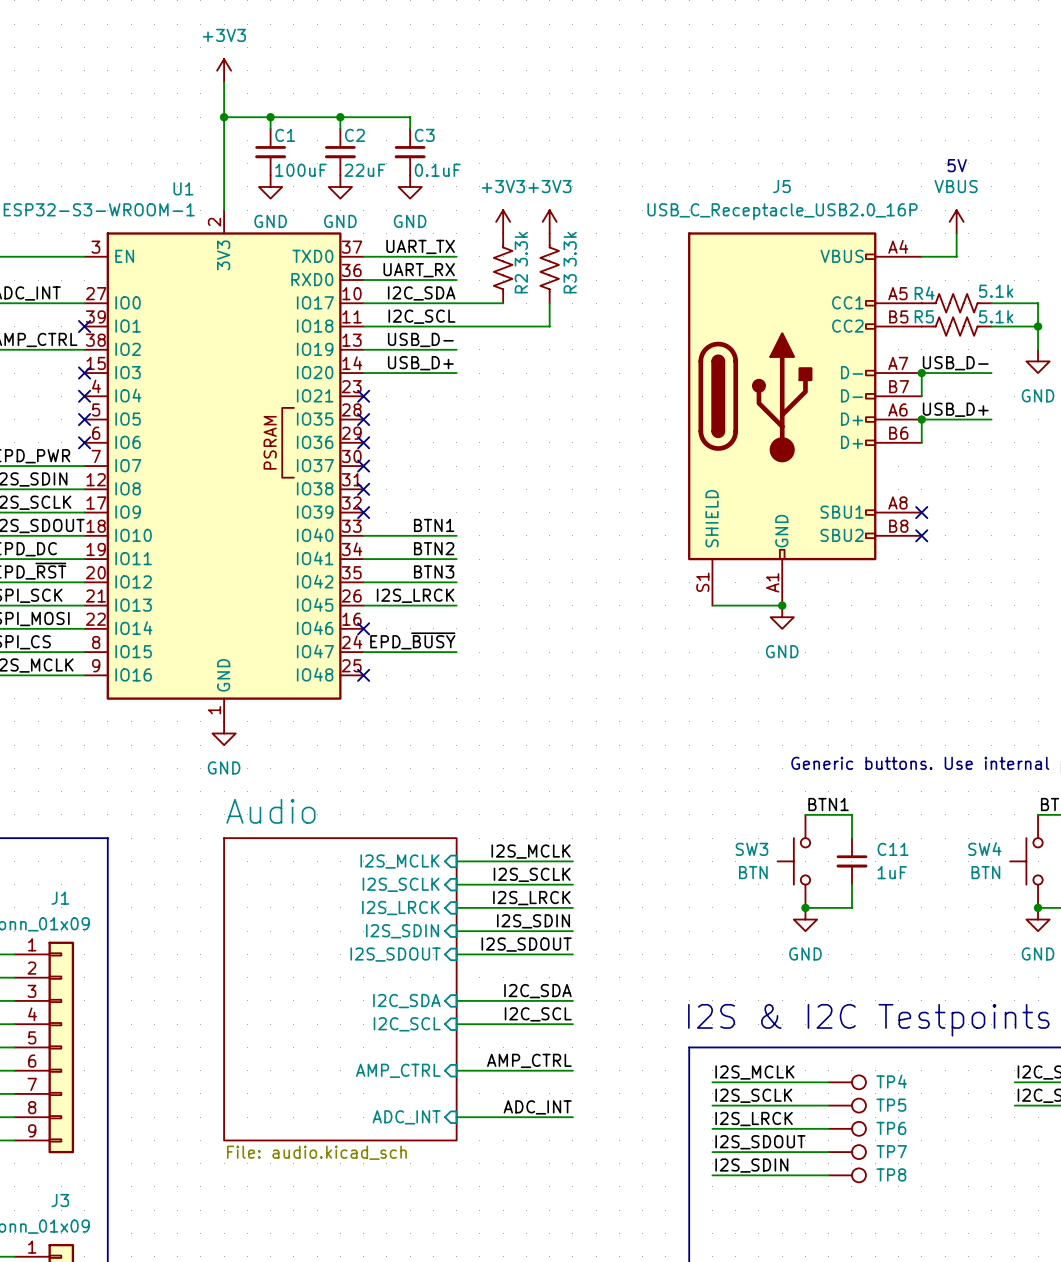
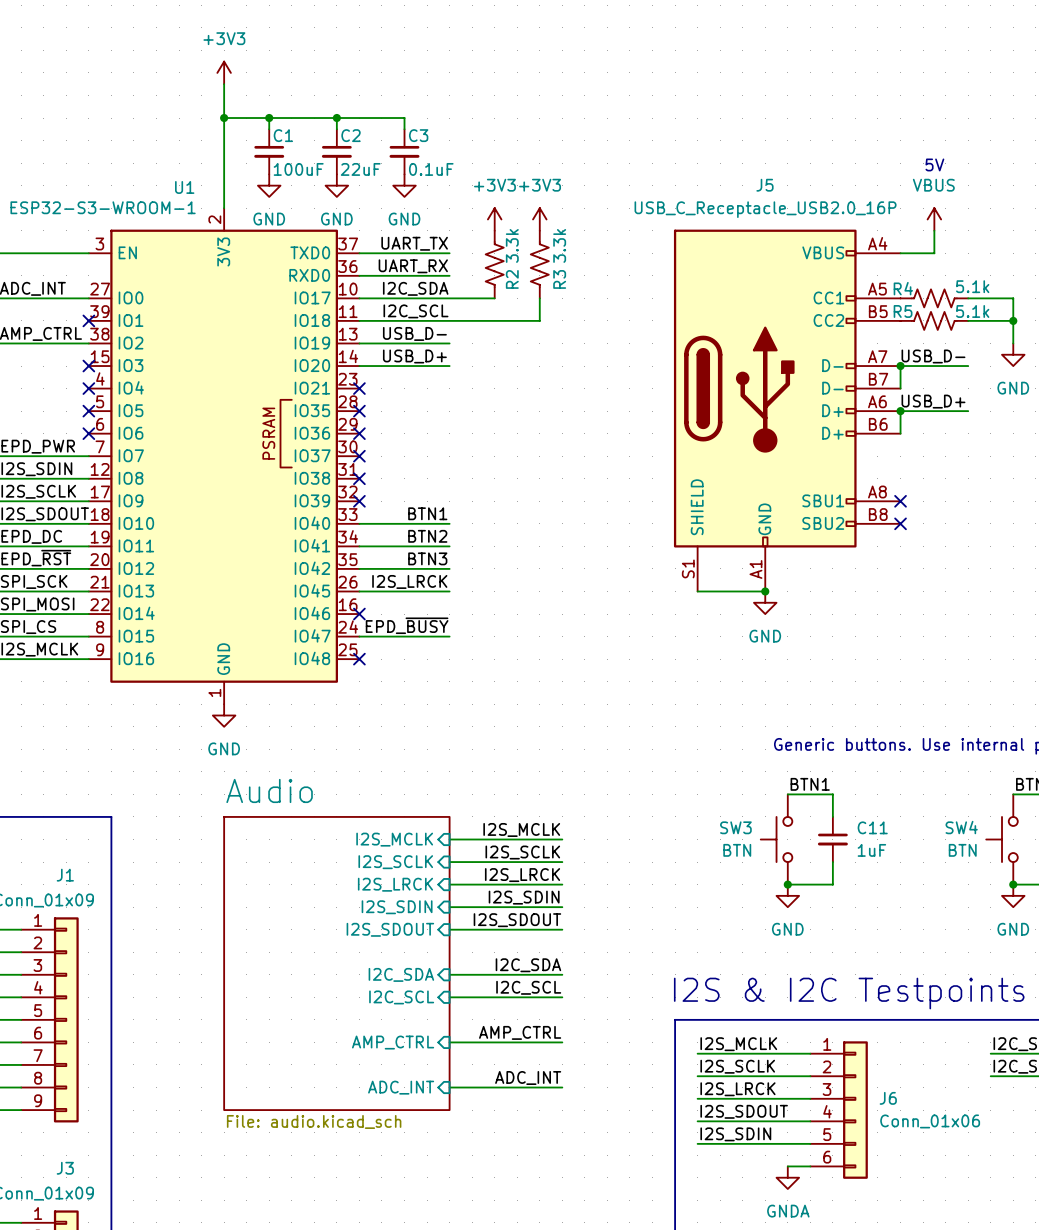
TP4: (847, 1082) -> none
TP5: (847, 1105) -> none
TP6: (847, 1128) -> none
J6: none -> Conn_01x06 (839, 1110)
TP7: (847, 1152) -> none
TP8: (847, 1175) -> none
wire: none -> (787, 1166) (810, 1166)
power symbol: none -> GNDA (787, 1177)

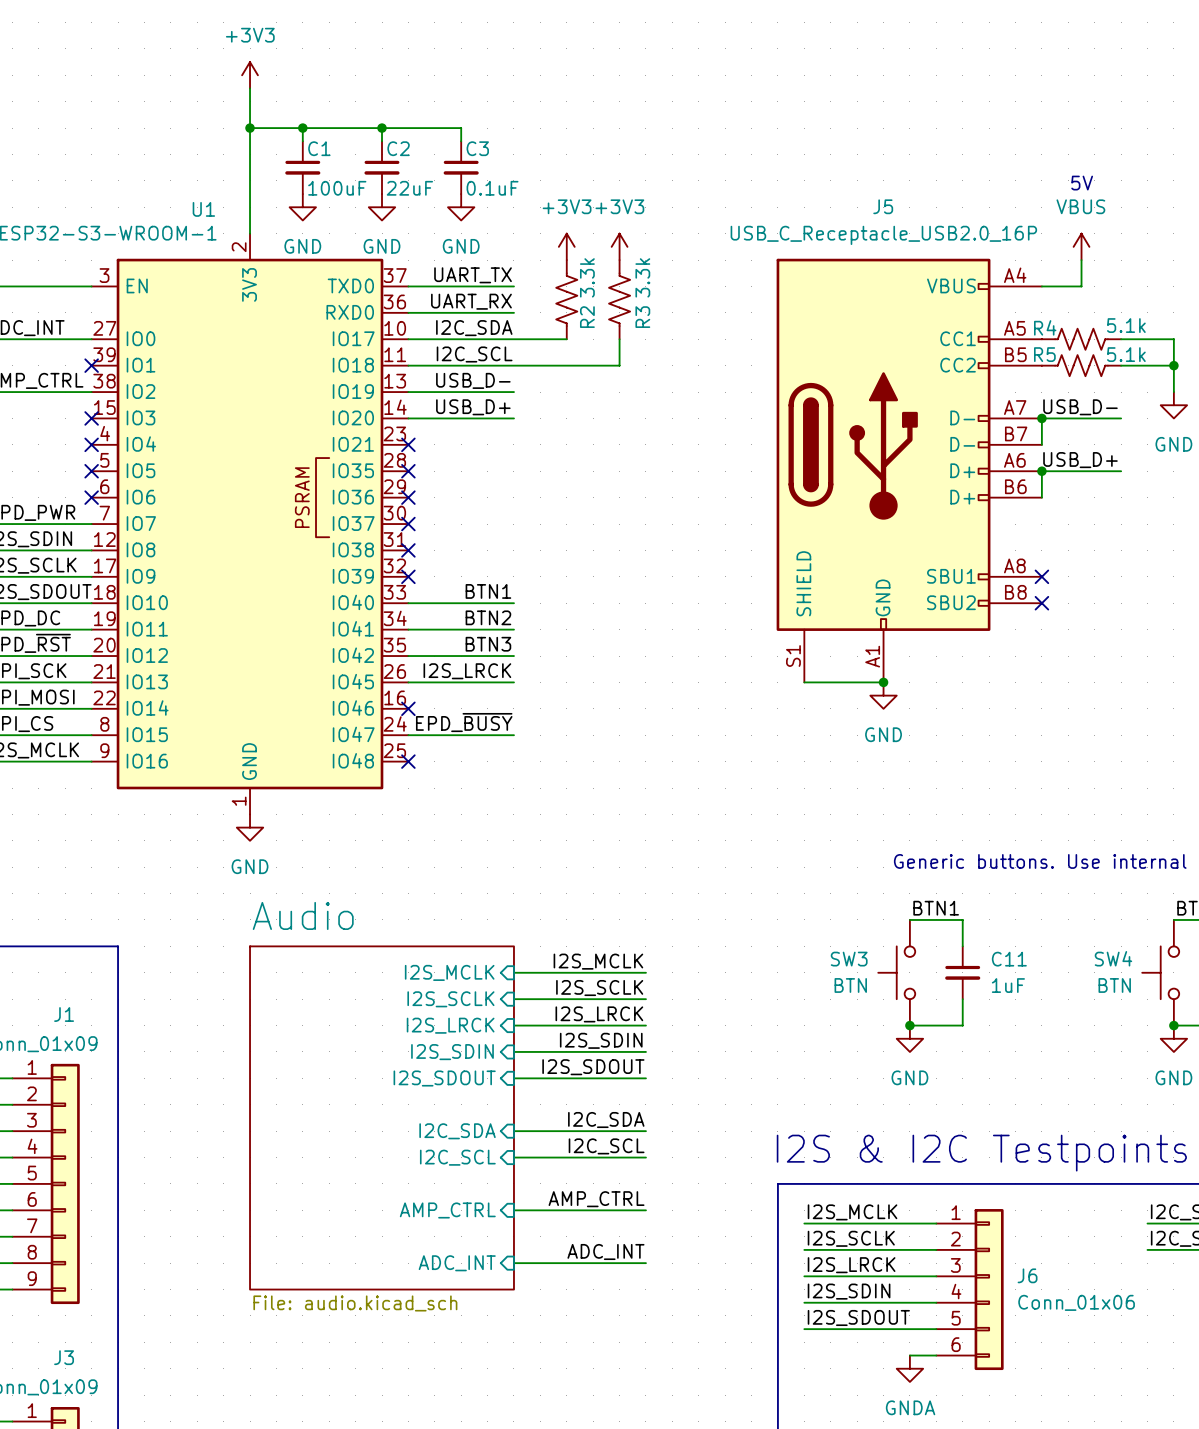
label: I2S_SDOUT (744, 1111) -> I2S_SDIN (849, 1291)
label: I2S_SDIN (735, 1134) -> I2S_SDOUT (858, 1317)

